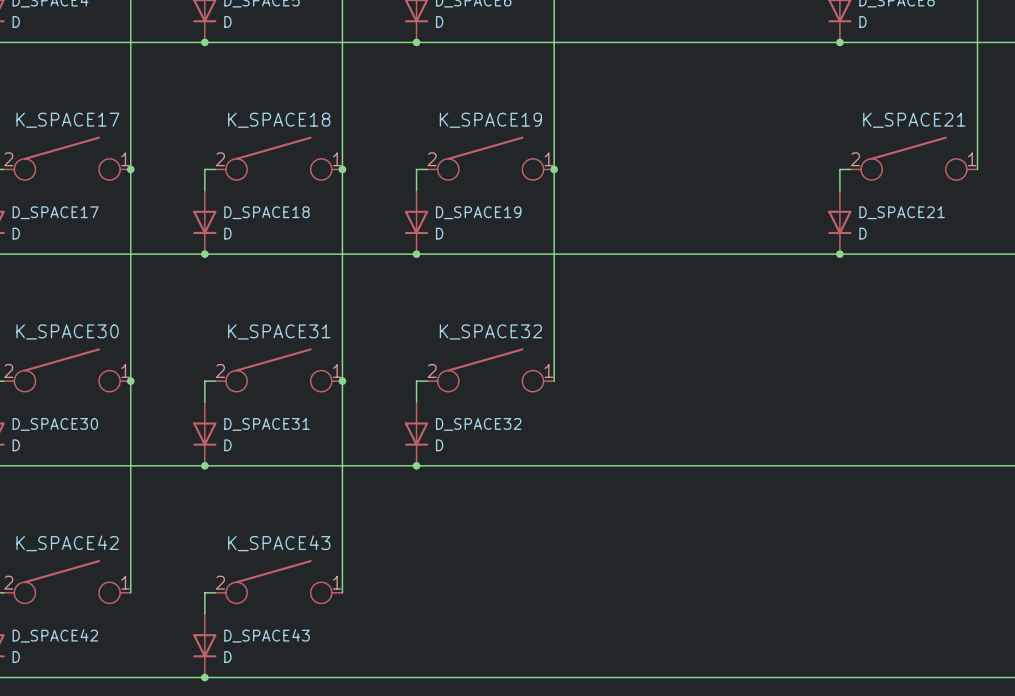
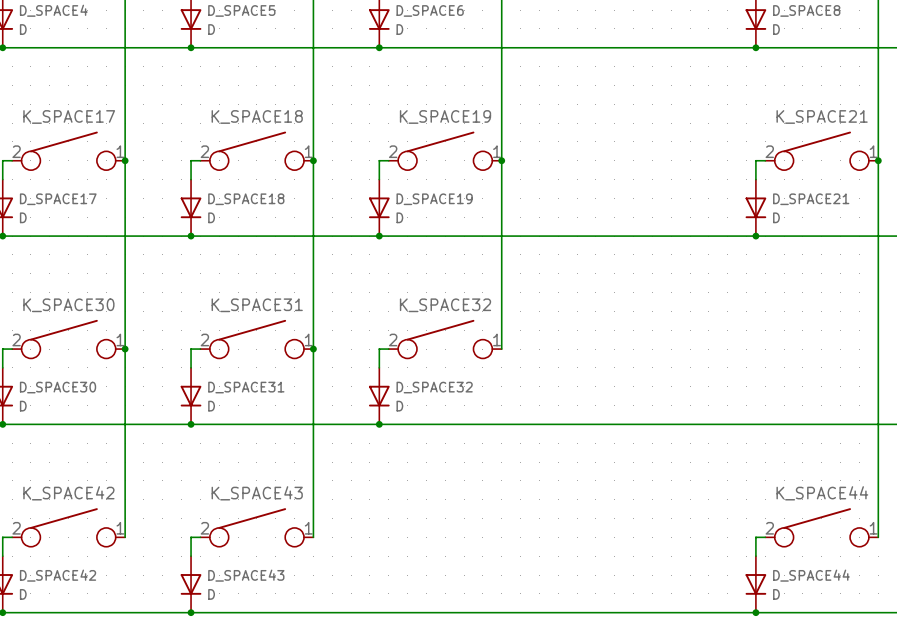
wire: none -> (878, 160) (878, 537)
junction: none -> (878, 160)
K_SPACE44: none -> (821, 527)
wire: none -> (765, 537) (755, 537) (755, 556)
D_SPACE44: none -> D (755, 584)
junction: none -> (755, 612)

